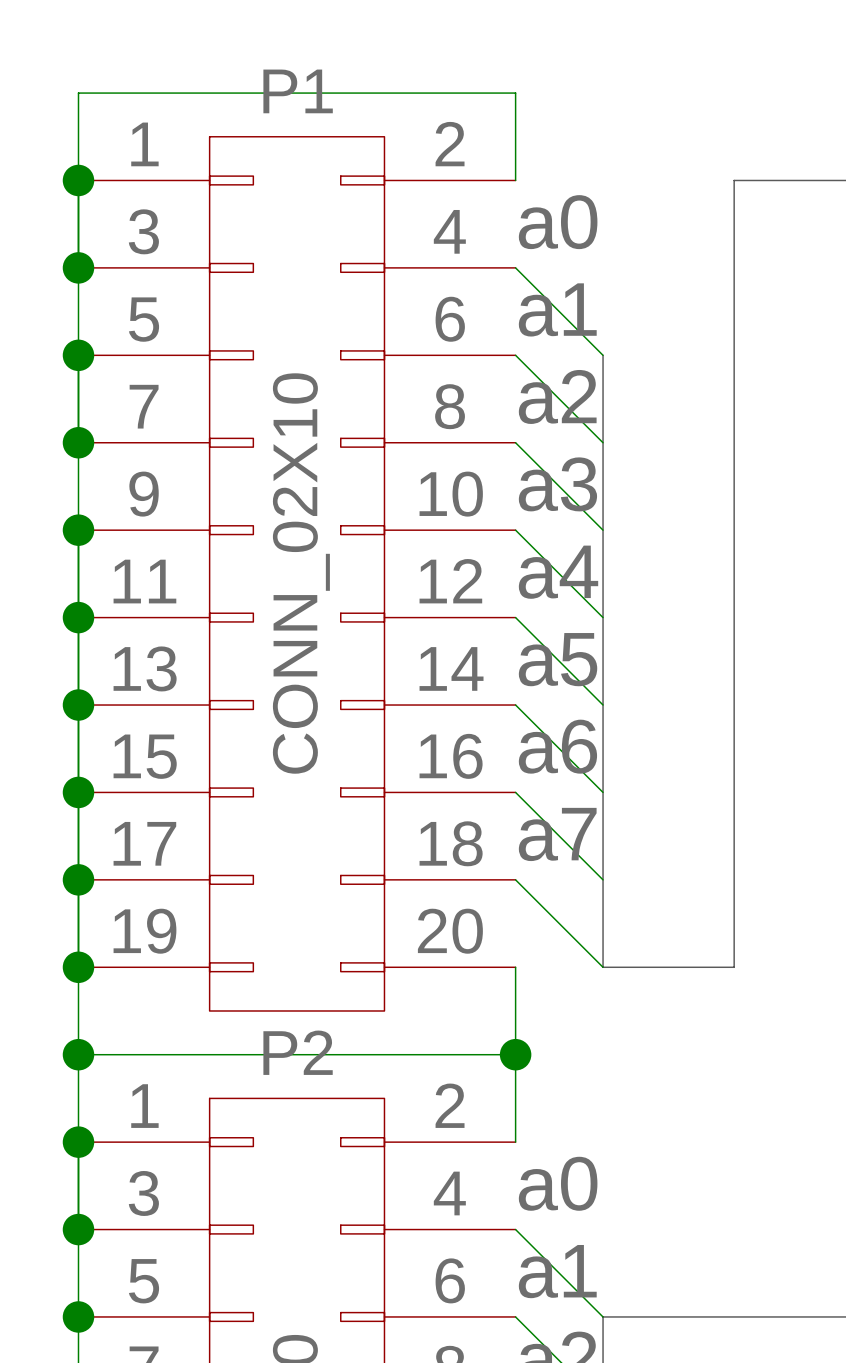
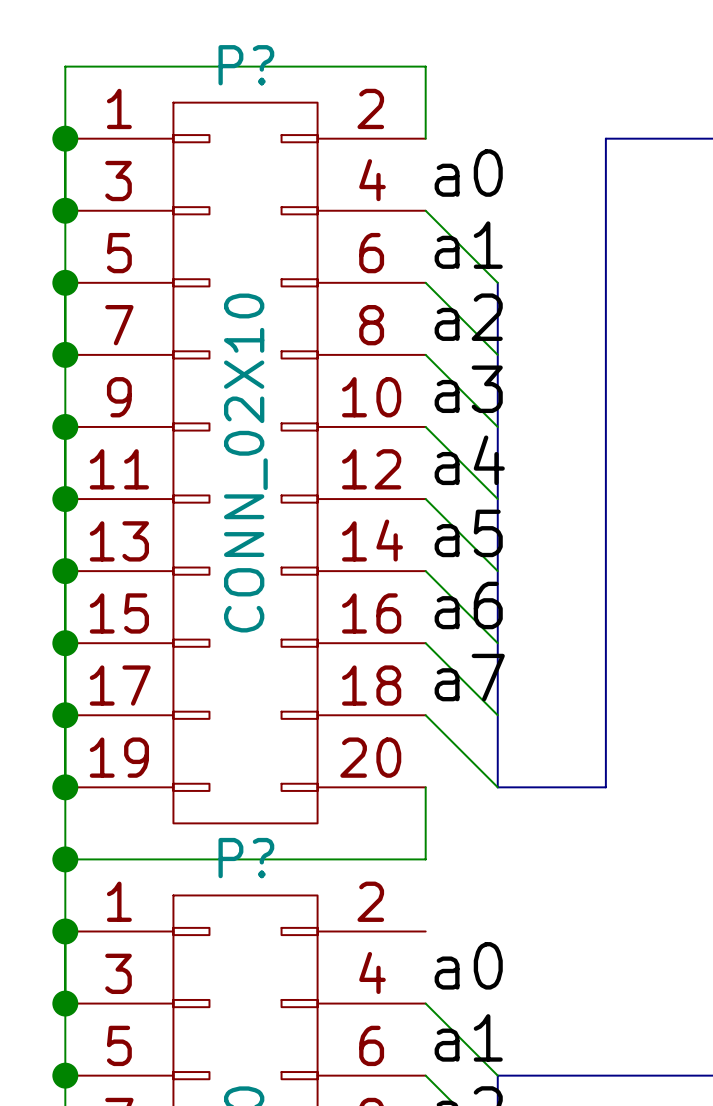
P1 name: P1 (298, 91) -> P? (246, 65)
P2 name: P2 (298, 1052) -> P? (246, 858)
wire: (515, 1054) (515, 1142) -> none
junction: (515, 1054) -> none

